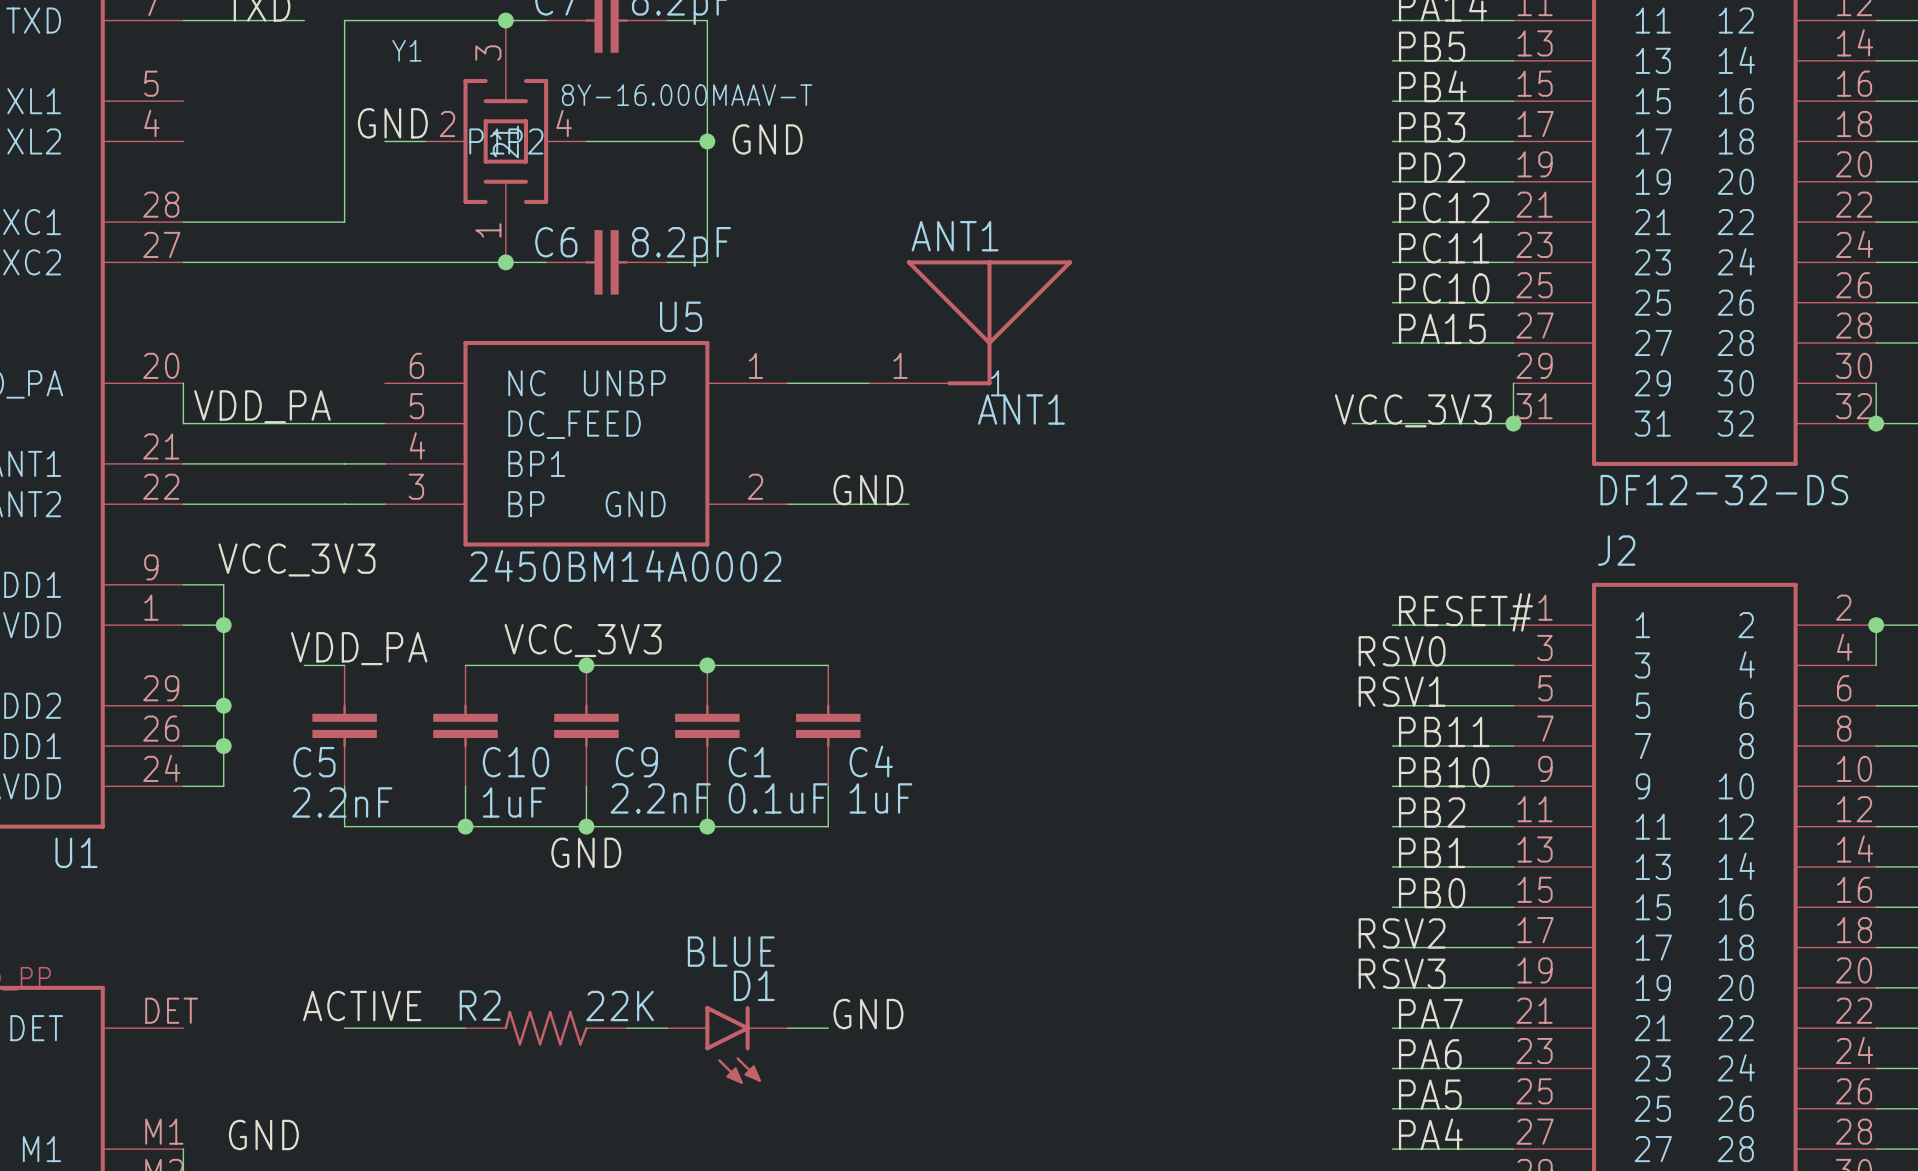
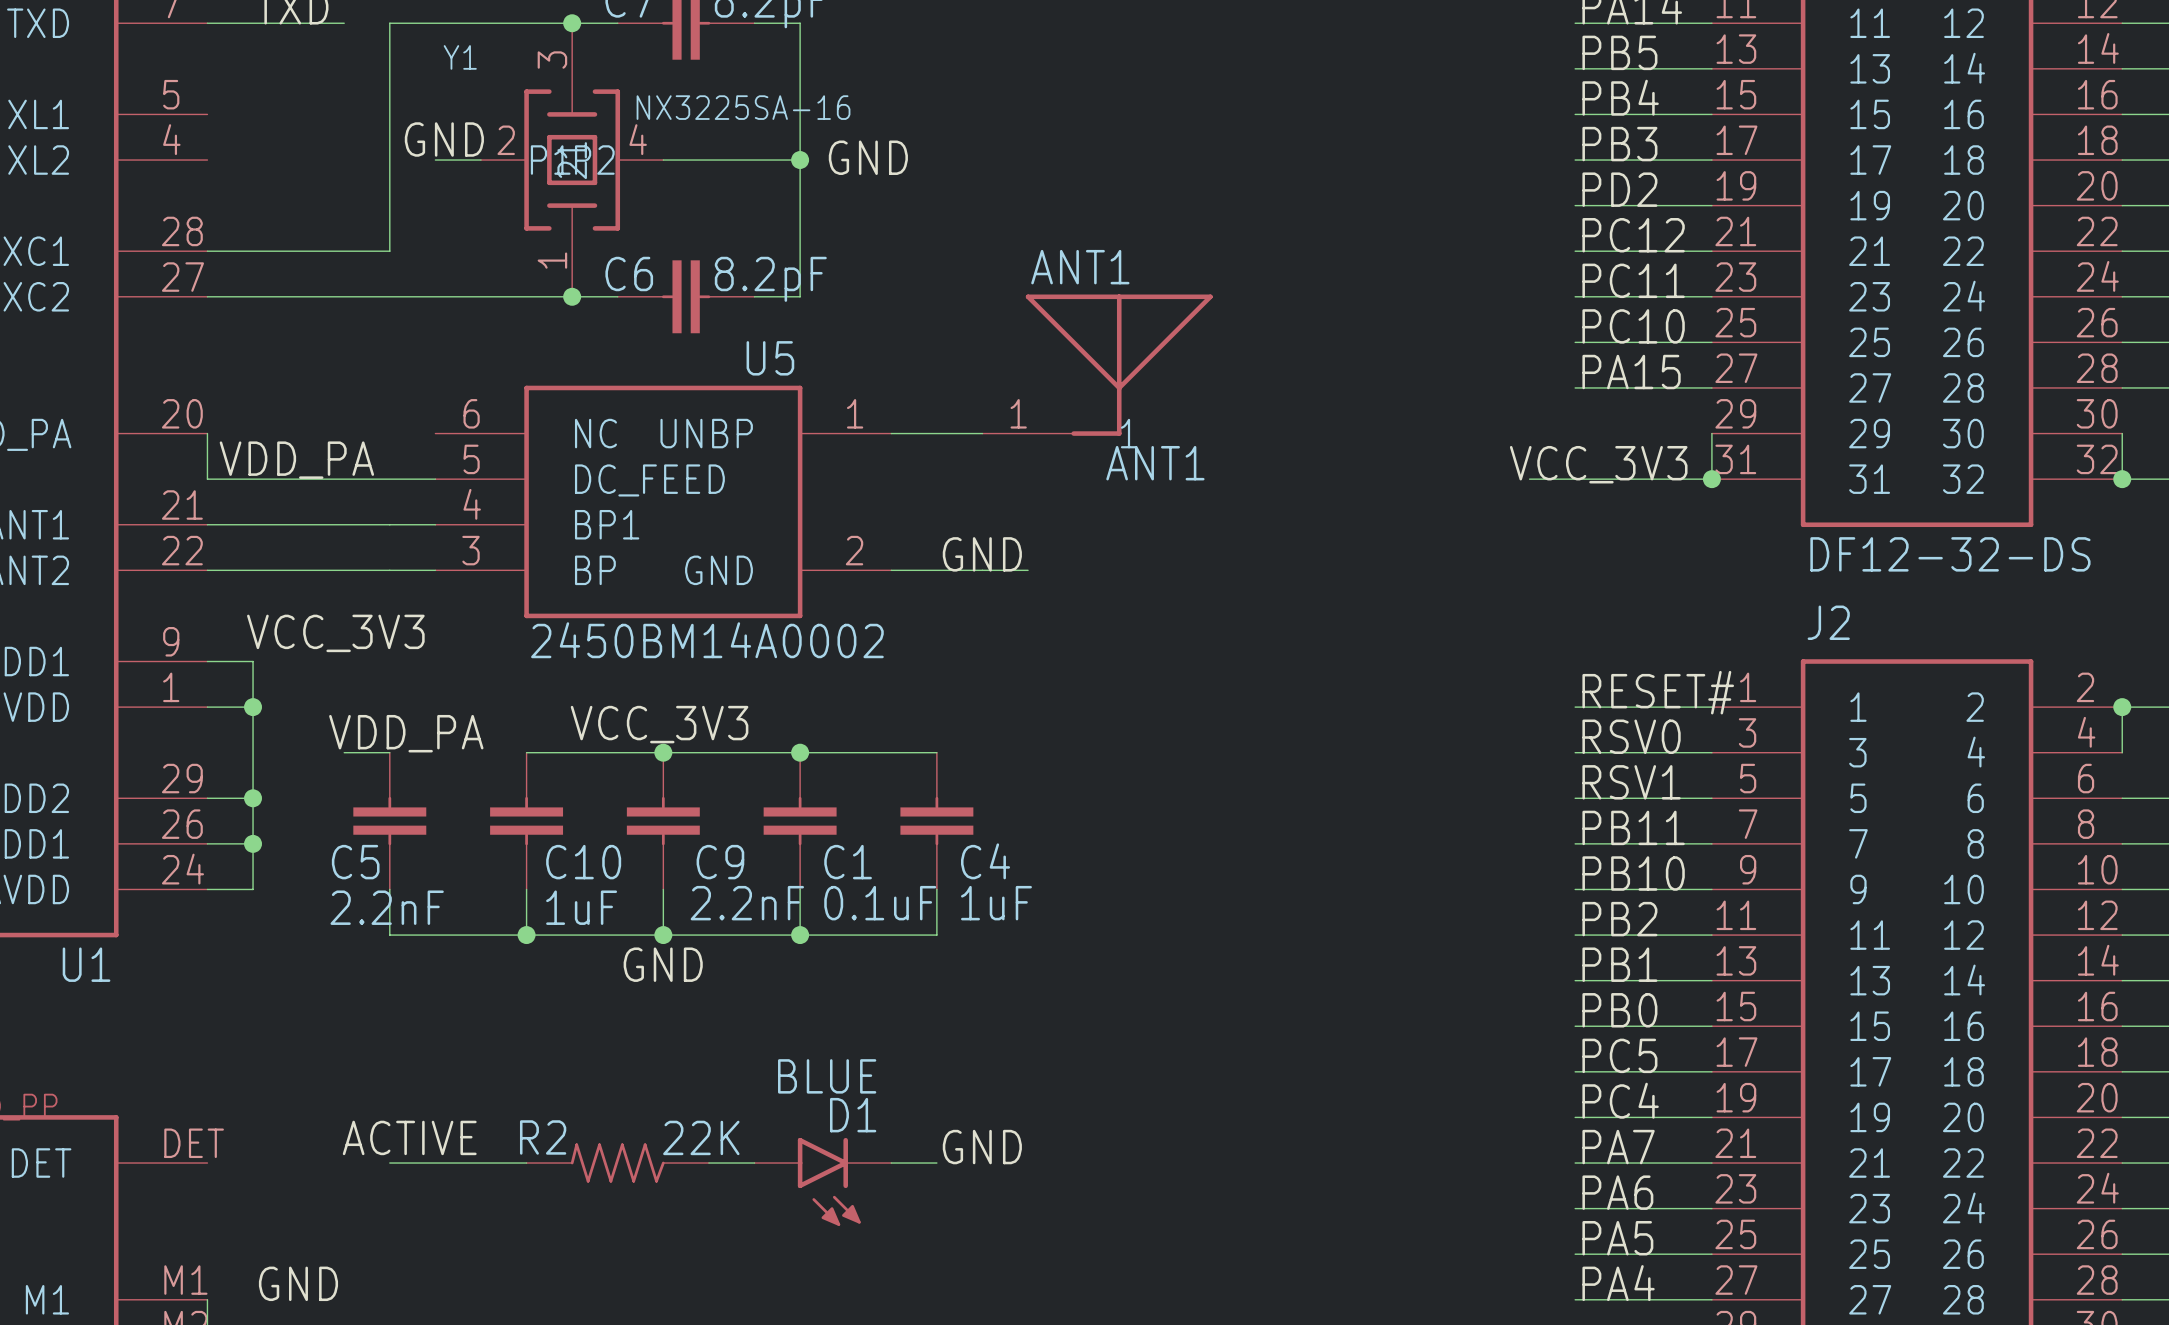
Y1 value: 8Y-16.000MAAV-T (687, 95) -> NX3225SA-16 (743, 107)
label position: RSV0 (1402, 651) -> RSV0 (1631, 736)
label position: RSV1 (1402, 691) -> RSV1 (1631, 782)
label: RSV2 (1402, 933) -> none
label: none -> PC5 (1619, 1055)
label: RSV3 (1402, 973) -> none
label: none -> PC4 (1620, 1100)

